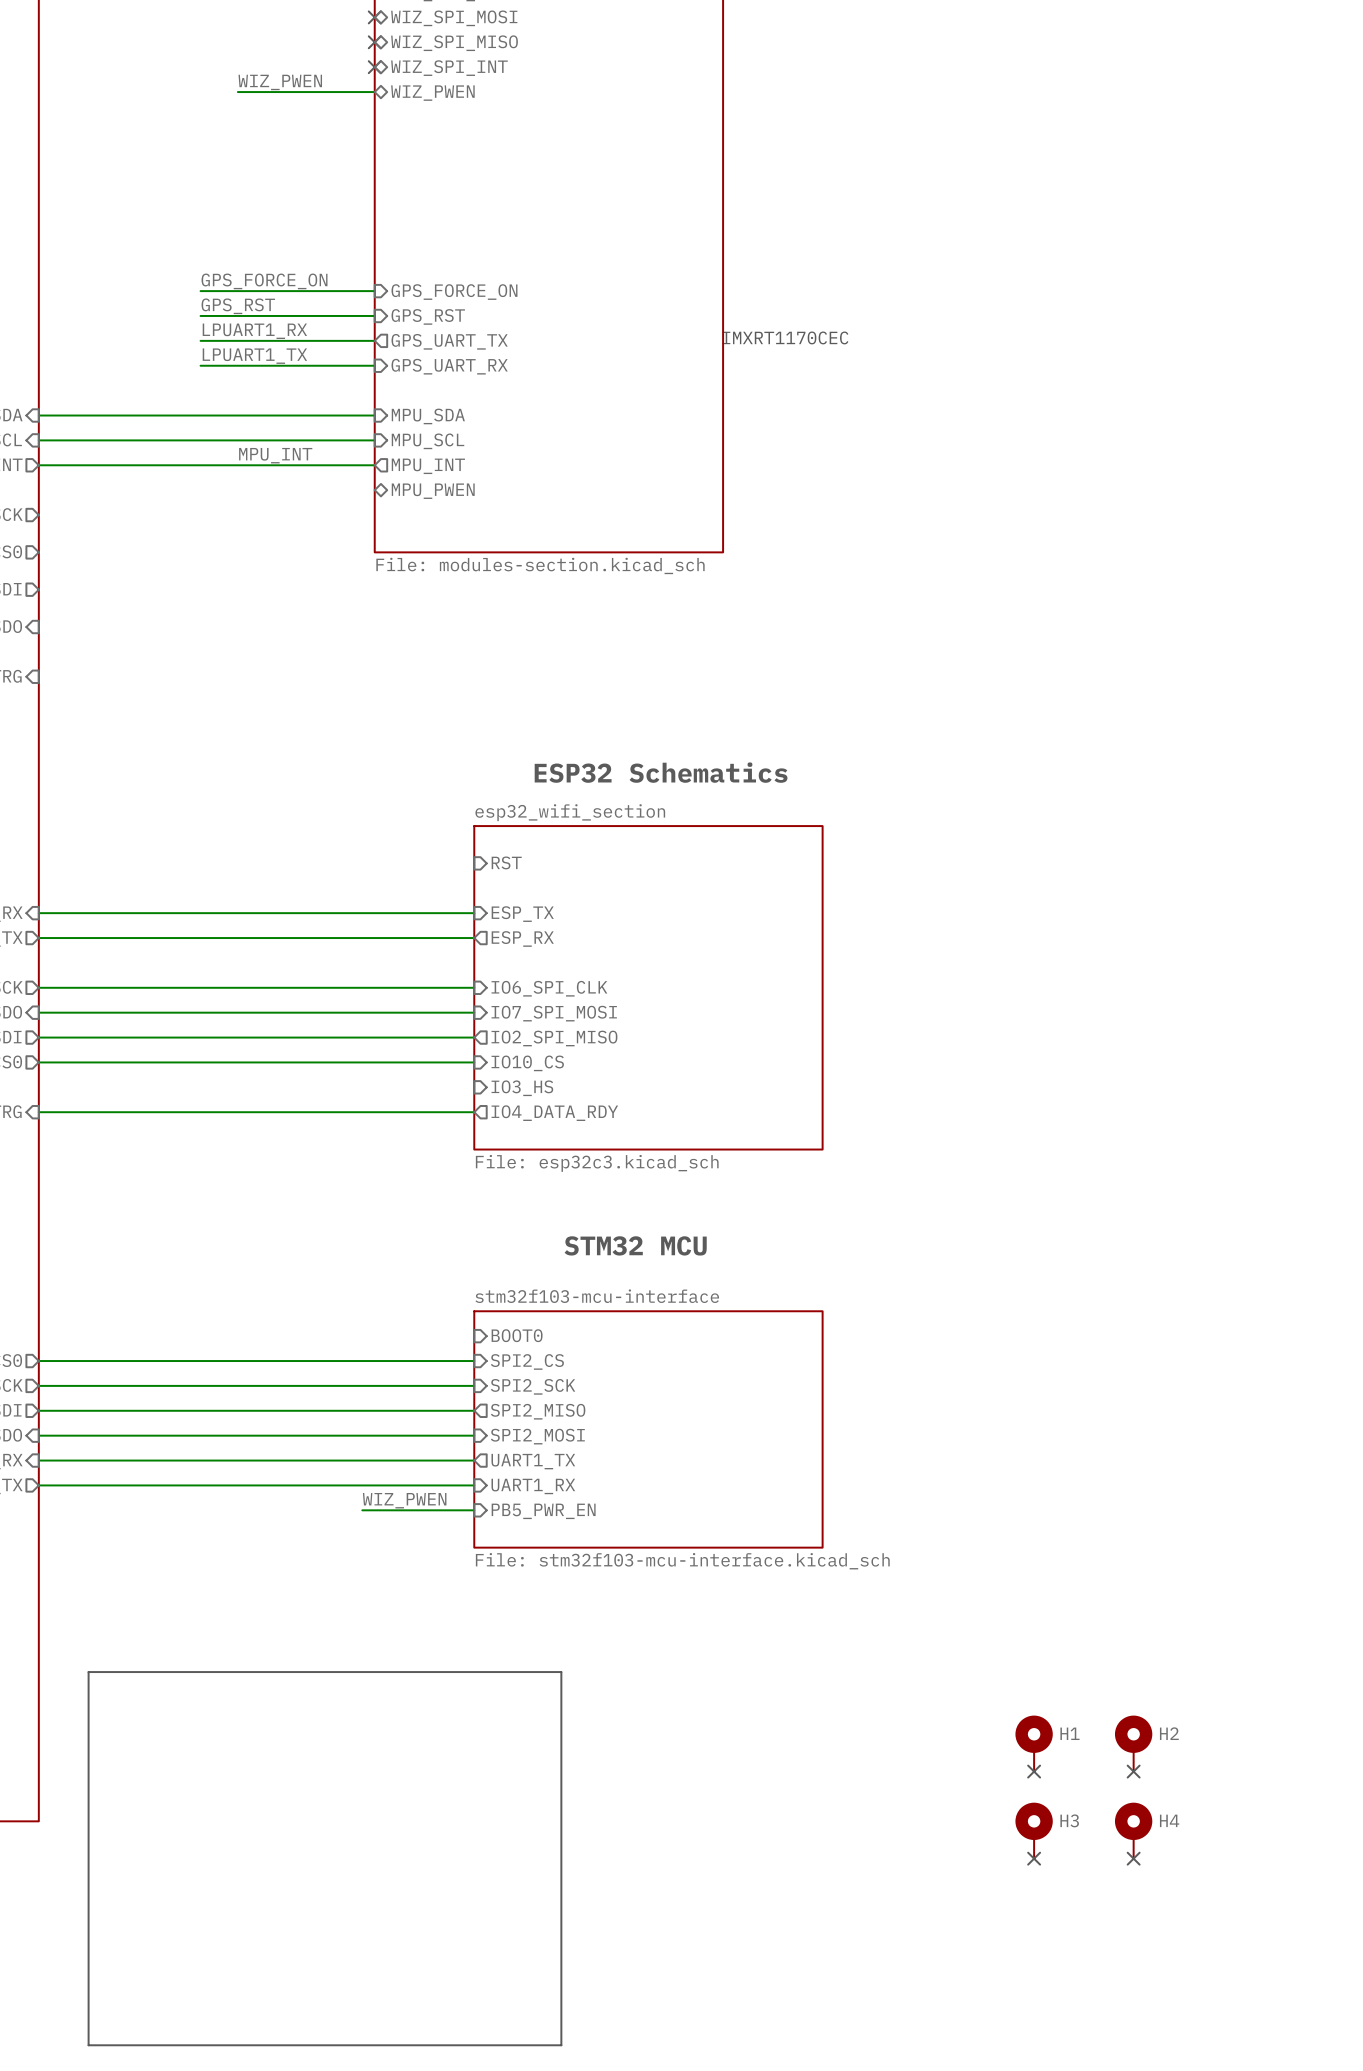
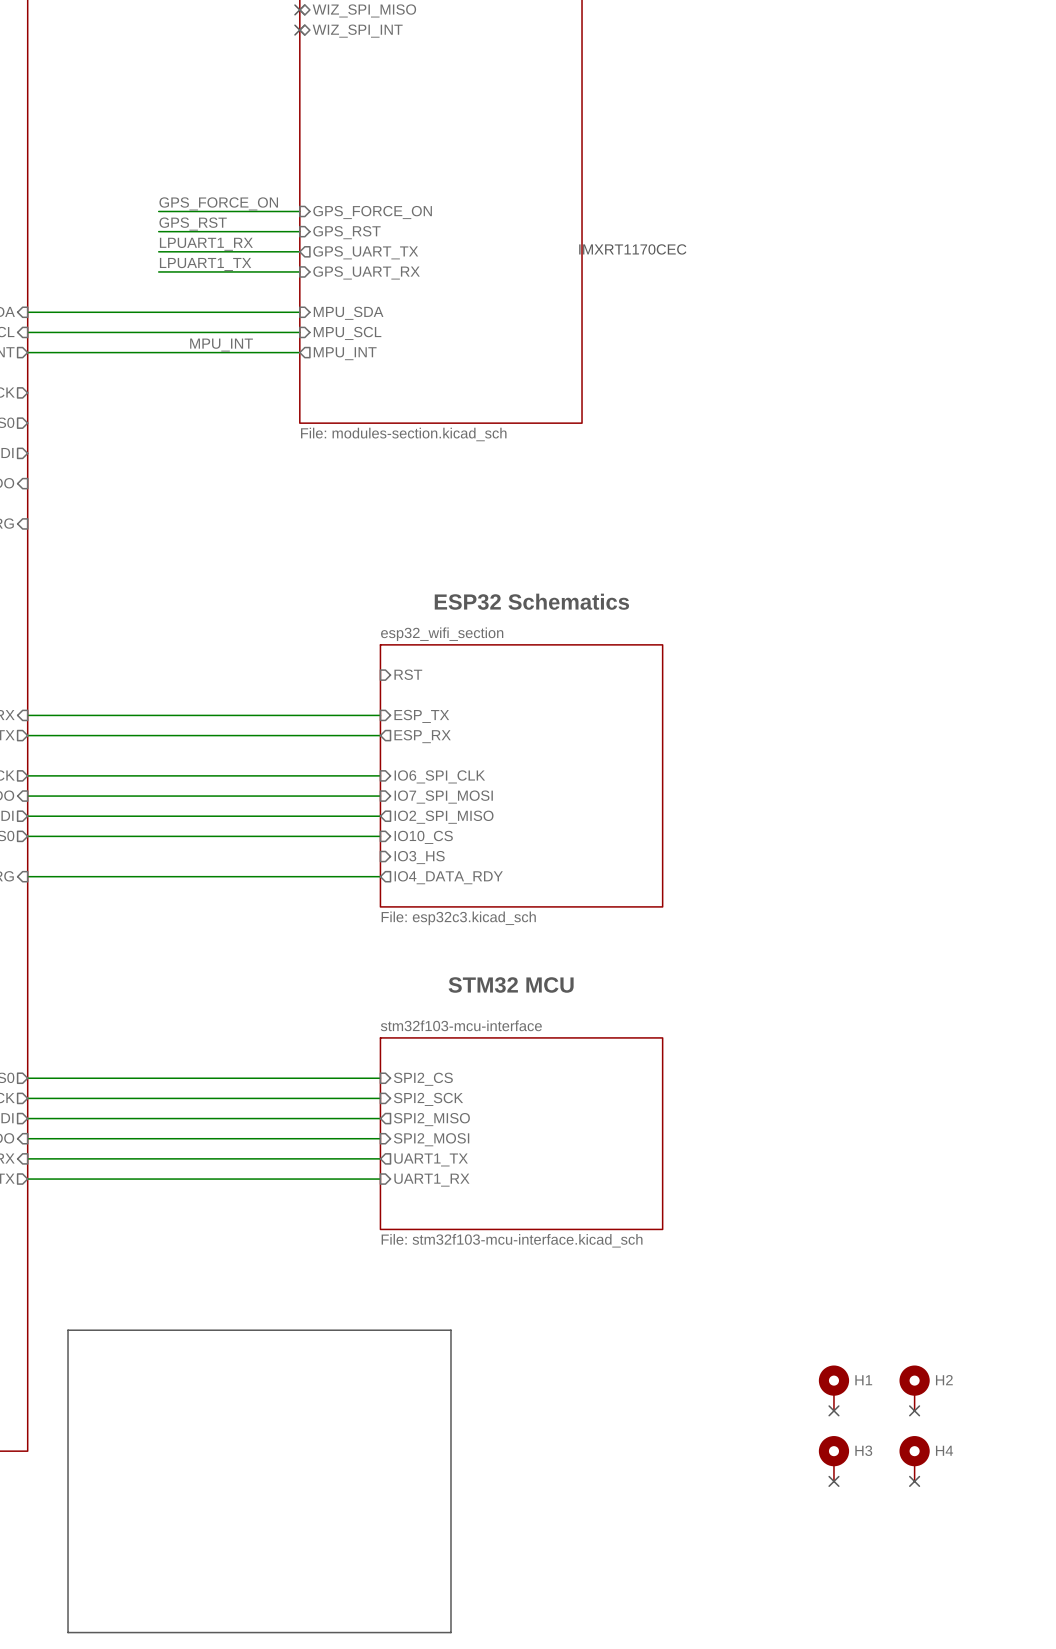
label: WIZ_PWEN (280, 82) -> none
wire: (237, 92) (374, 92) -> none
sheet pin: WIZ_PWEN (432, 93) -> none
sheet pin: MPU_PWEN (433, 491) -> none
sheet pin: BOOT0 (517, 1335) -> none
label: WIZ_PWEN (404, 1500) -> none
wire: (362, 1510) (474, 1510) -> none
sheet pin: PB5_PWR_EN (543, 1511) -> none

